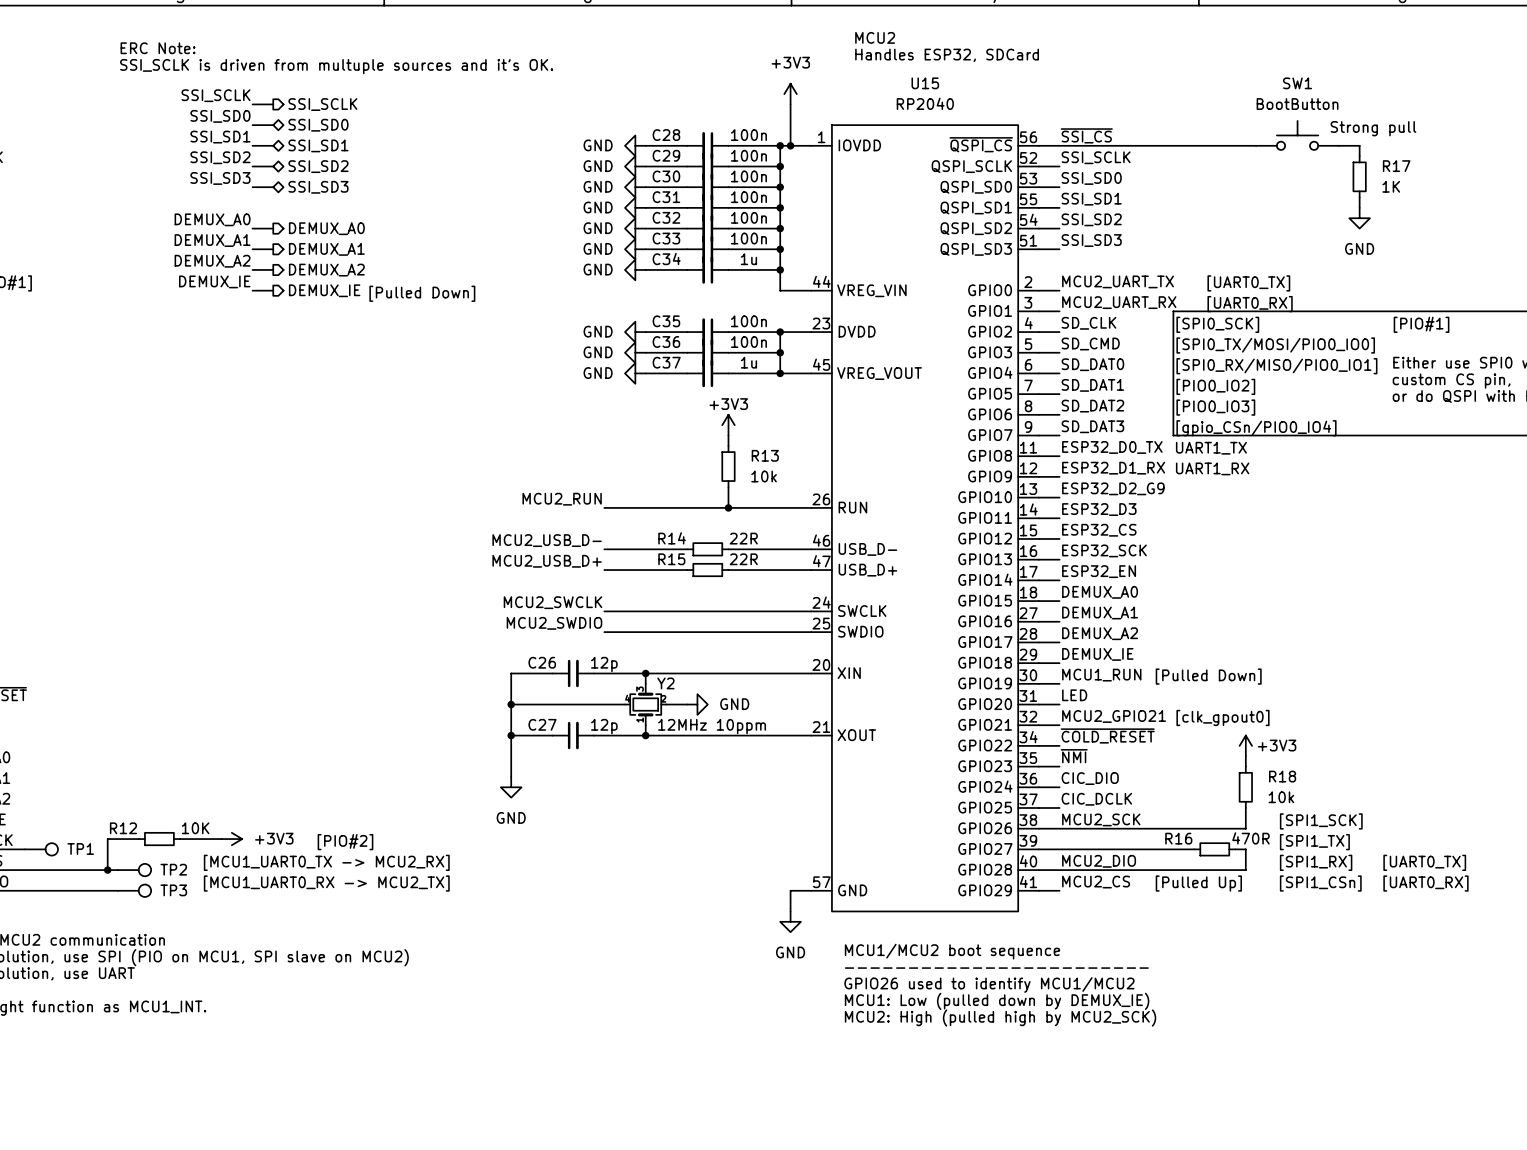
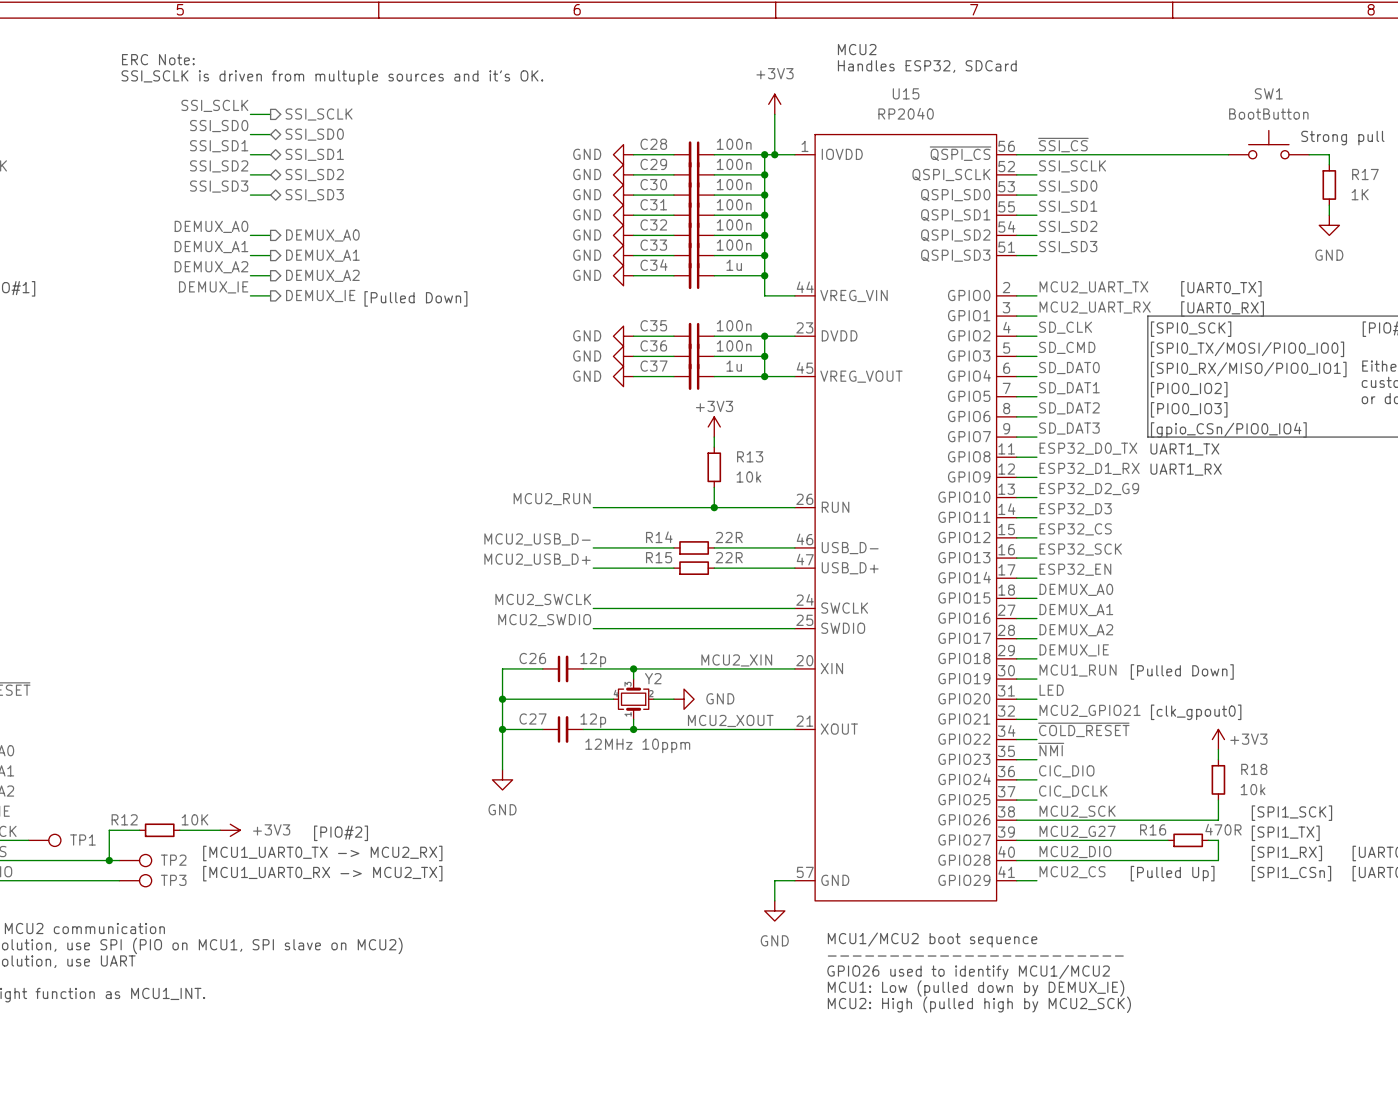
label: none -> MCU2_XIN (736, 660)
Y2 value position: 12MHz 10ppm (712, 726) -> 12MHz 10ppm (637, 745)
label: none -> MCU2_XOUT (730, 720)
label: none -> MCU2_G27 (1077, 831)

